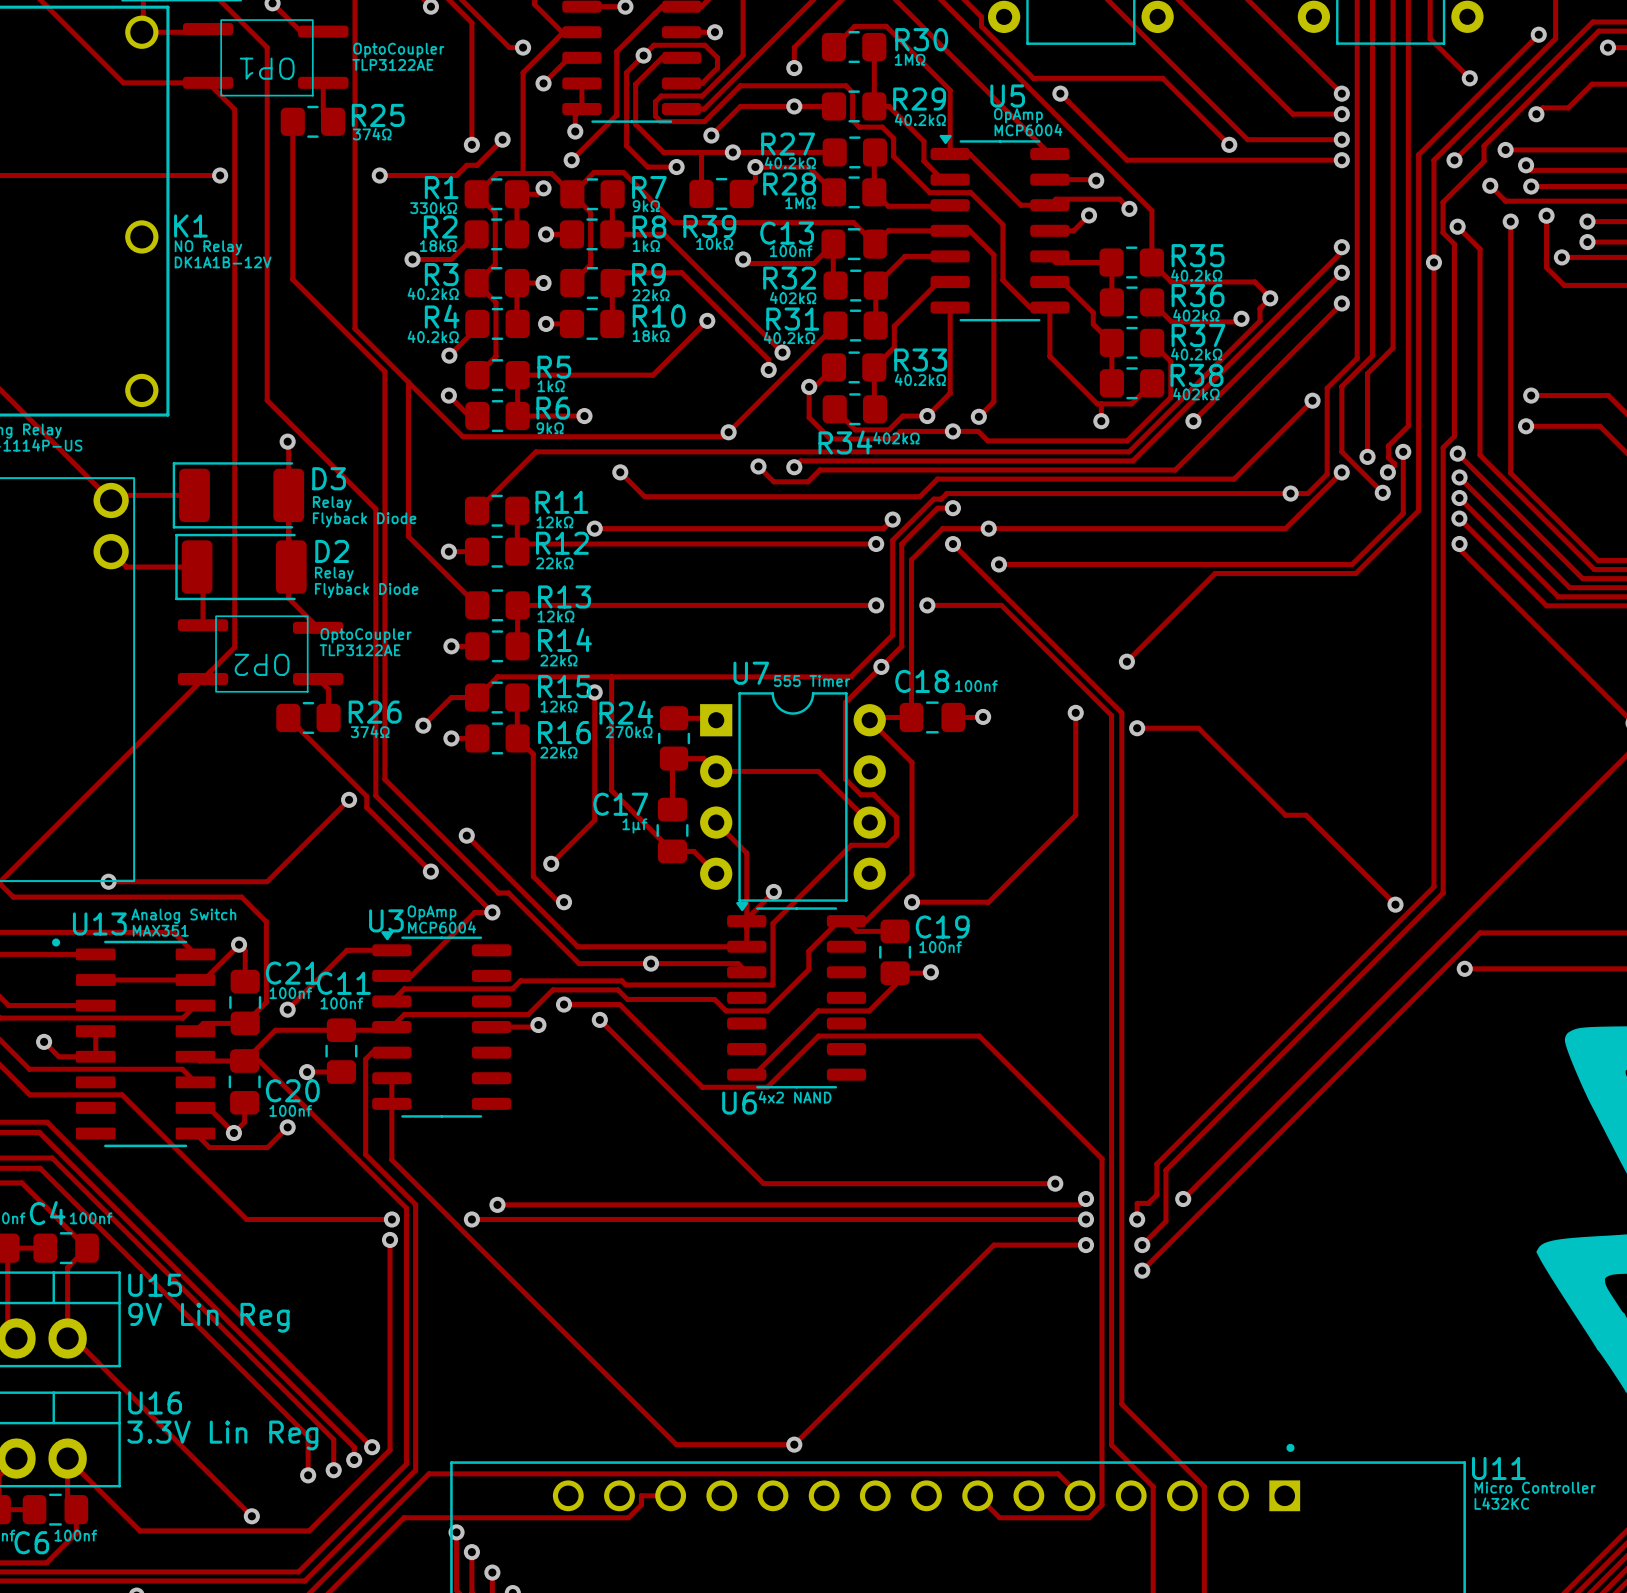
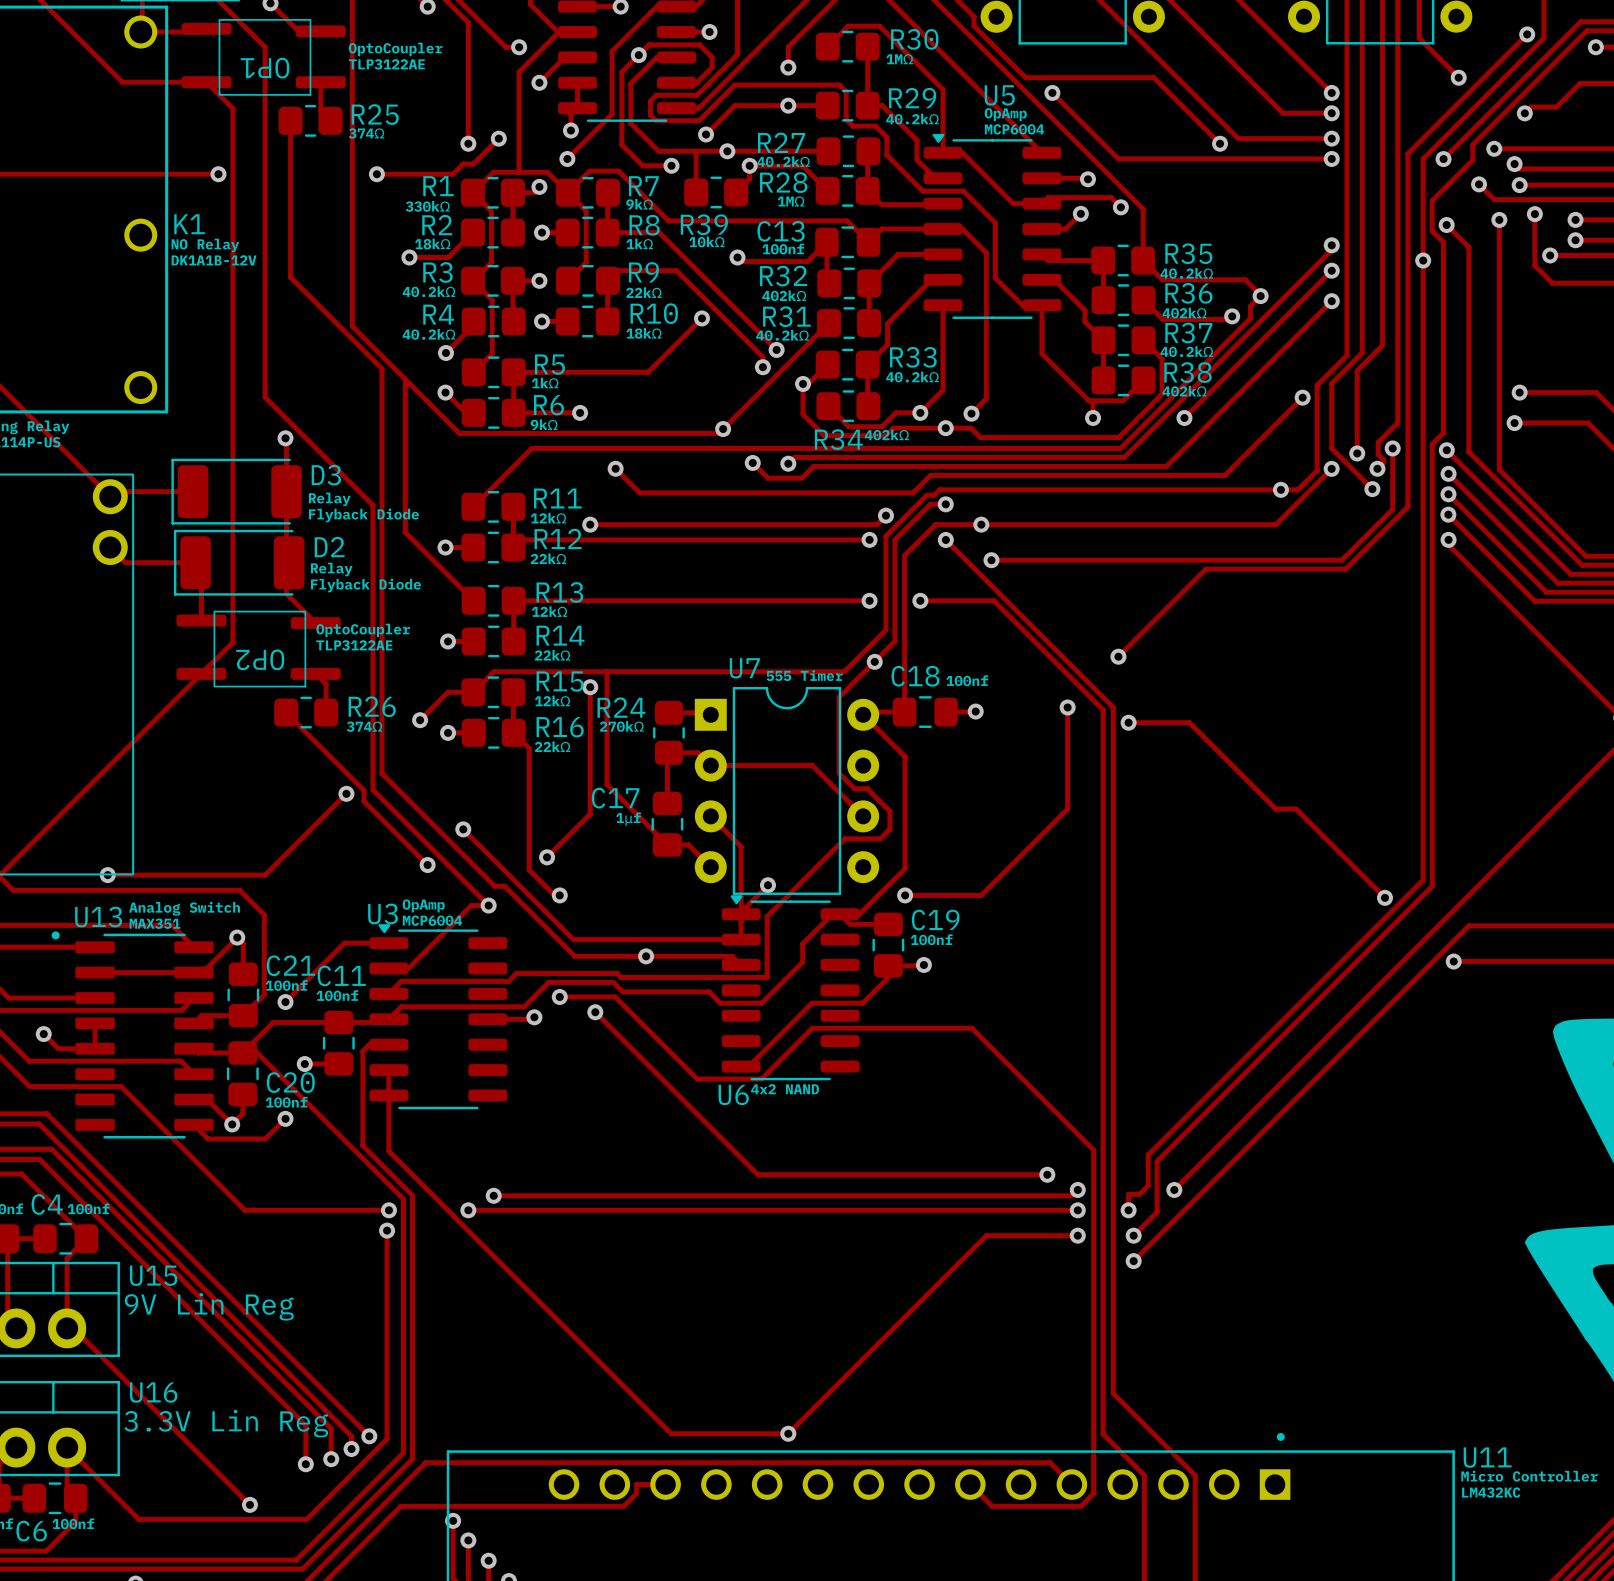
text: L432KC (1501, 1503) -> LM432KC (1491, 1492)

